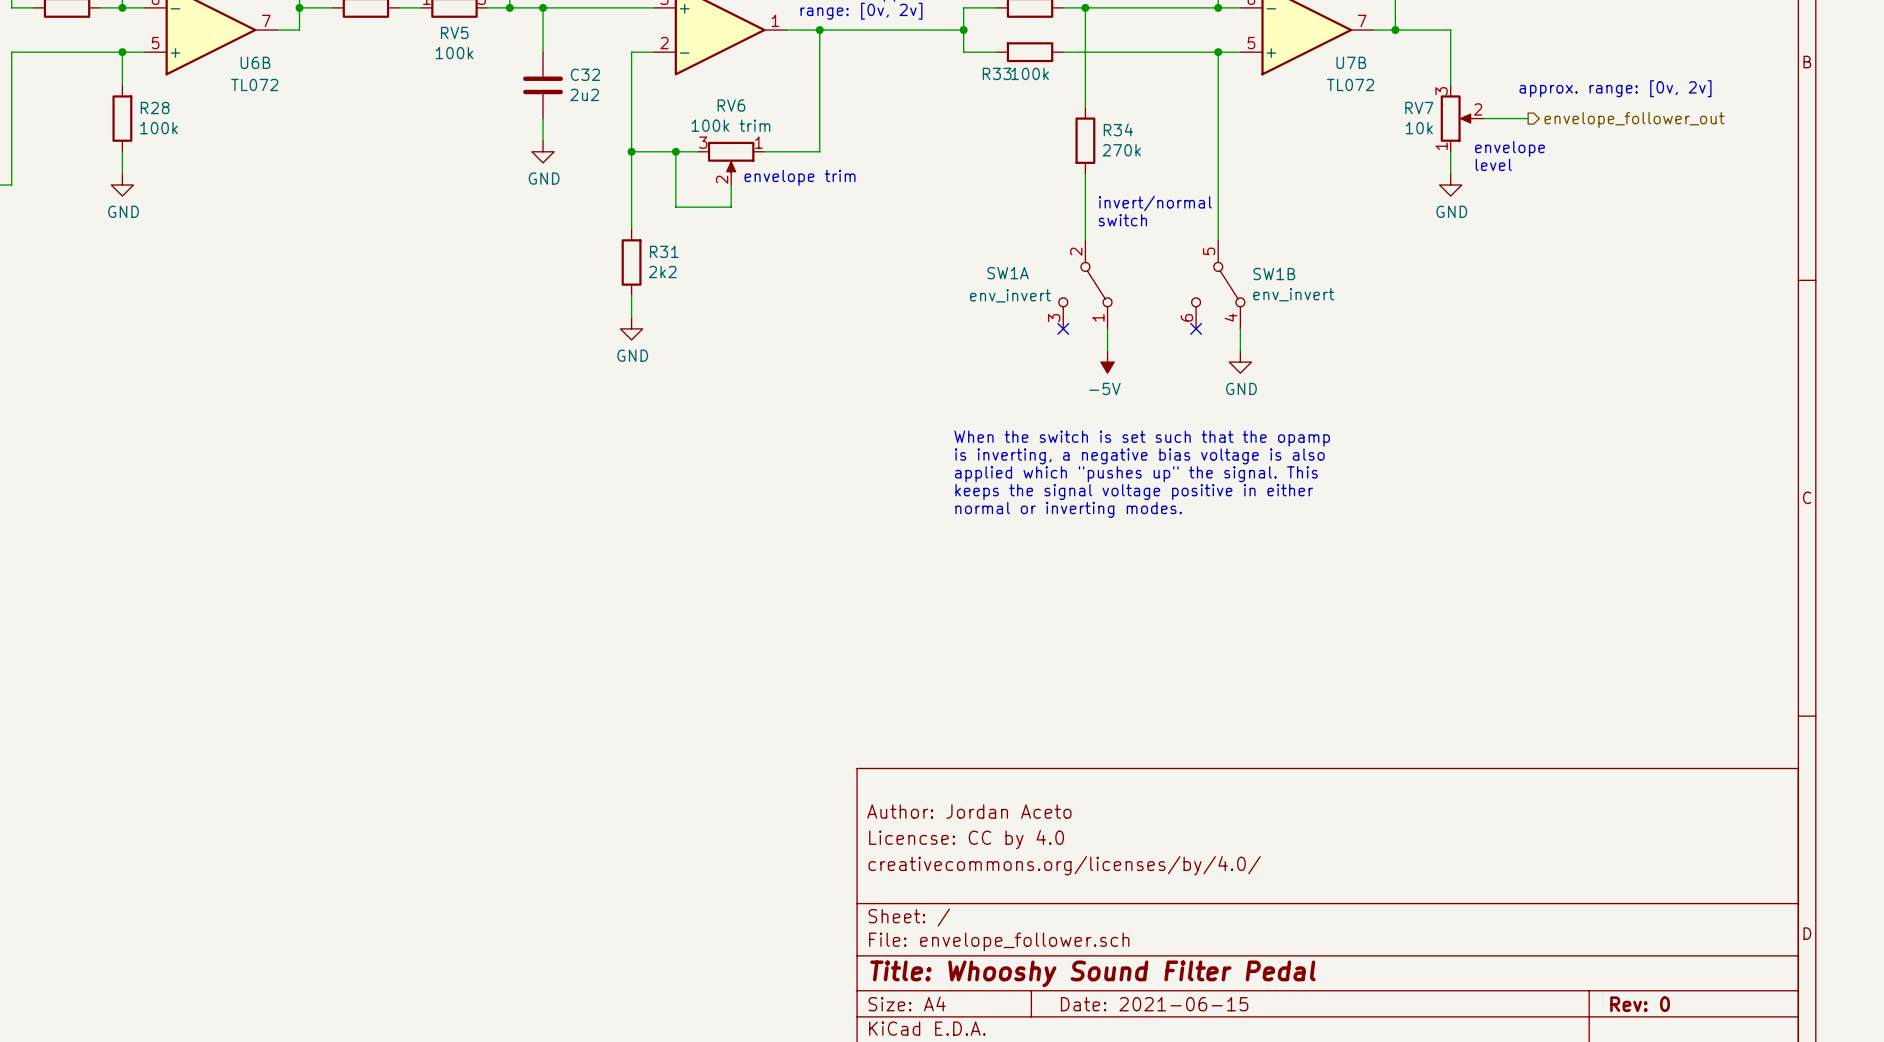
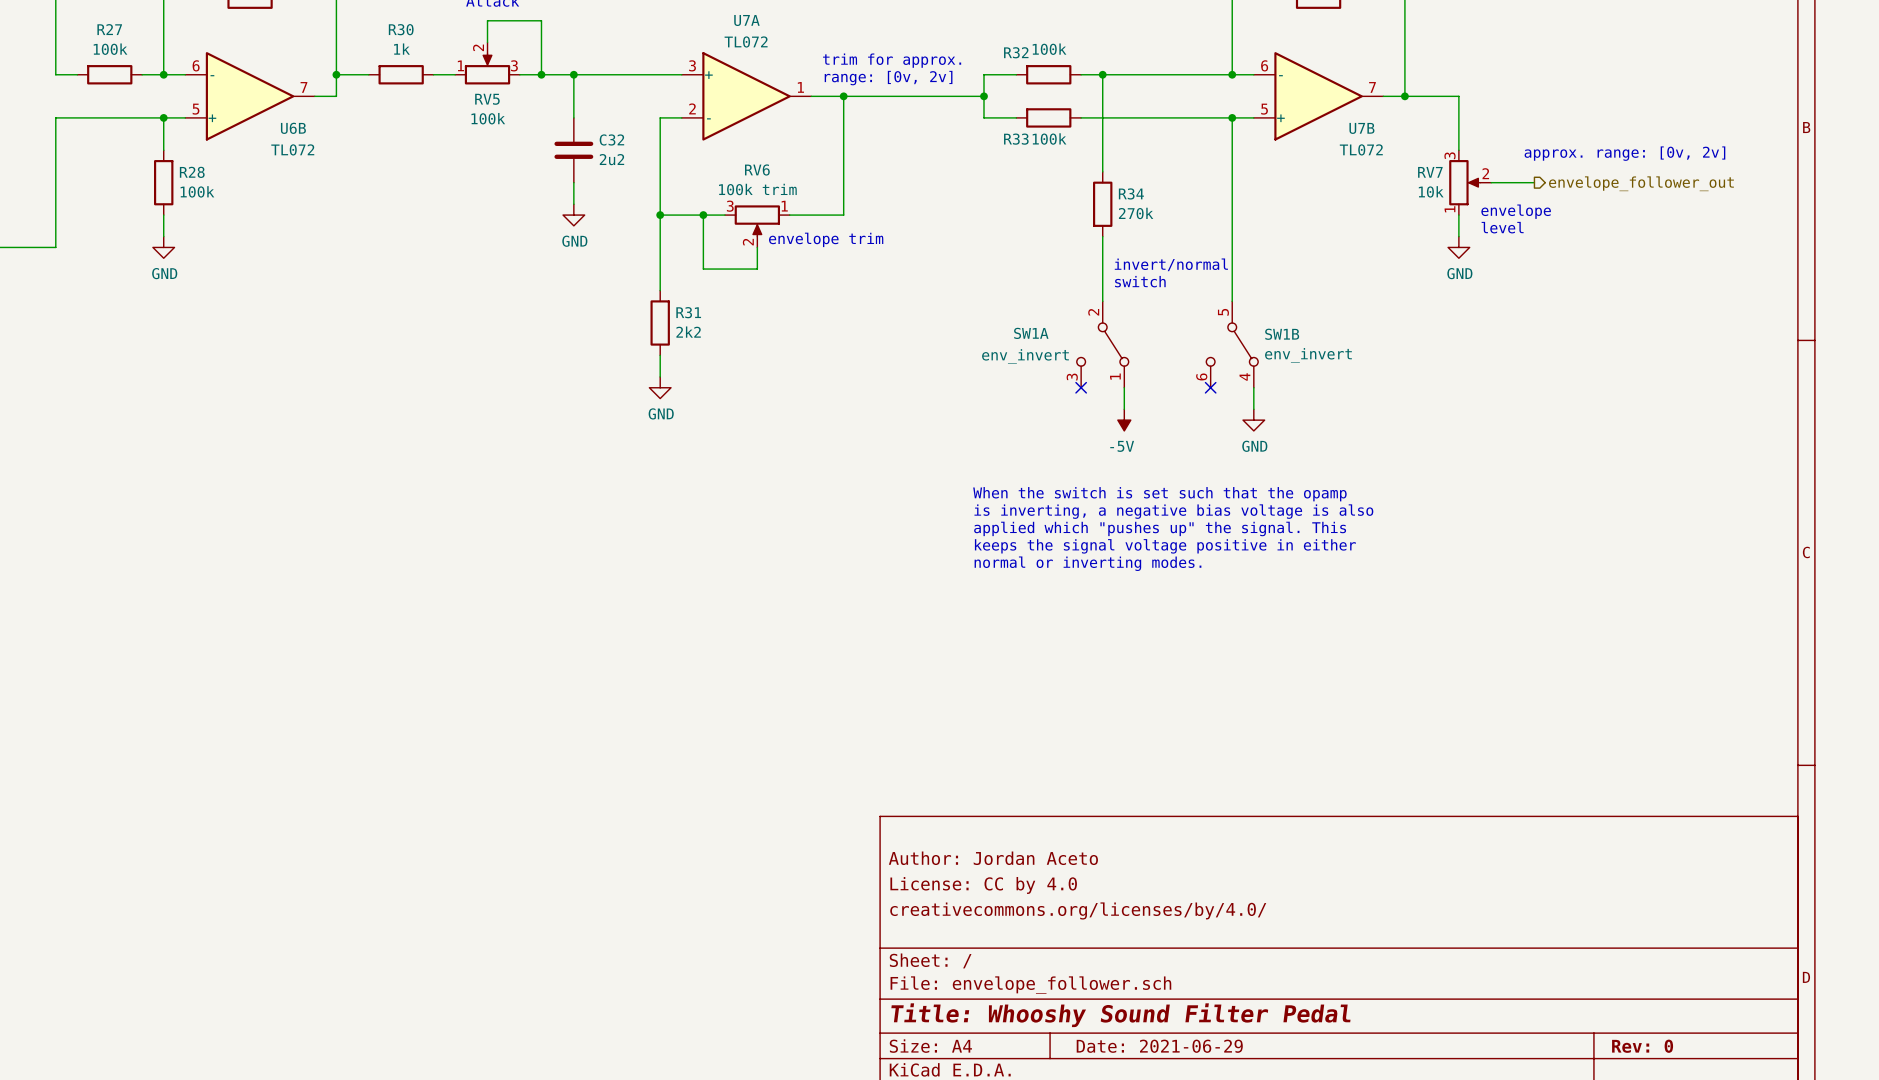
title block: Licencse: CC by 4.0 (966, 839) -> License: CC by 4.0 (983, 885)
title block: Date: 2021-06-15 (1154, 1004) -> Date: 2021-06-29 (1159, 1046)

